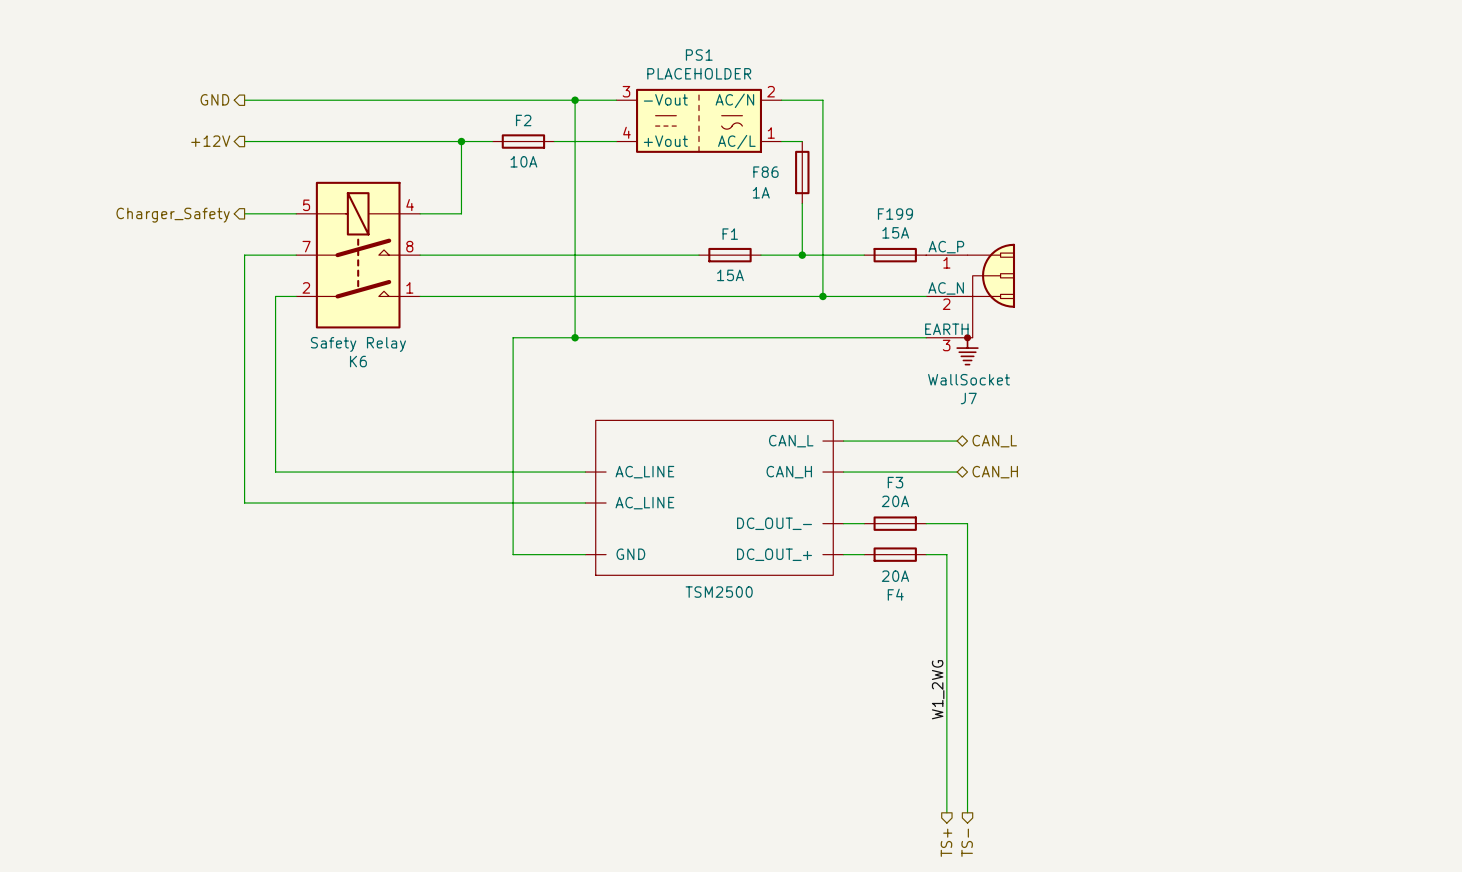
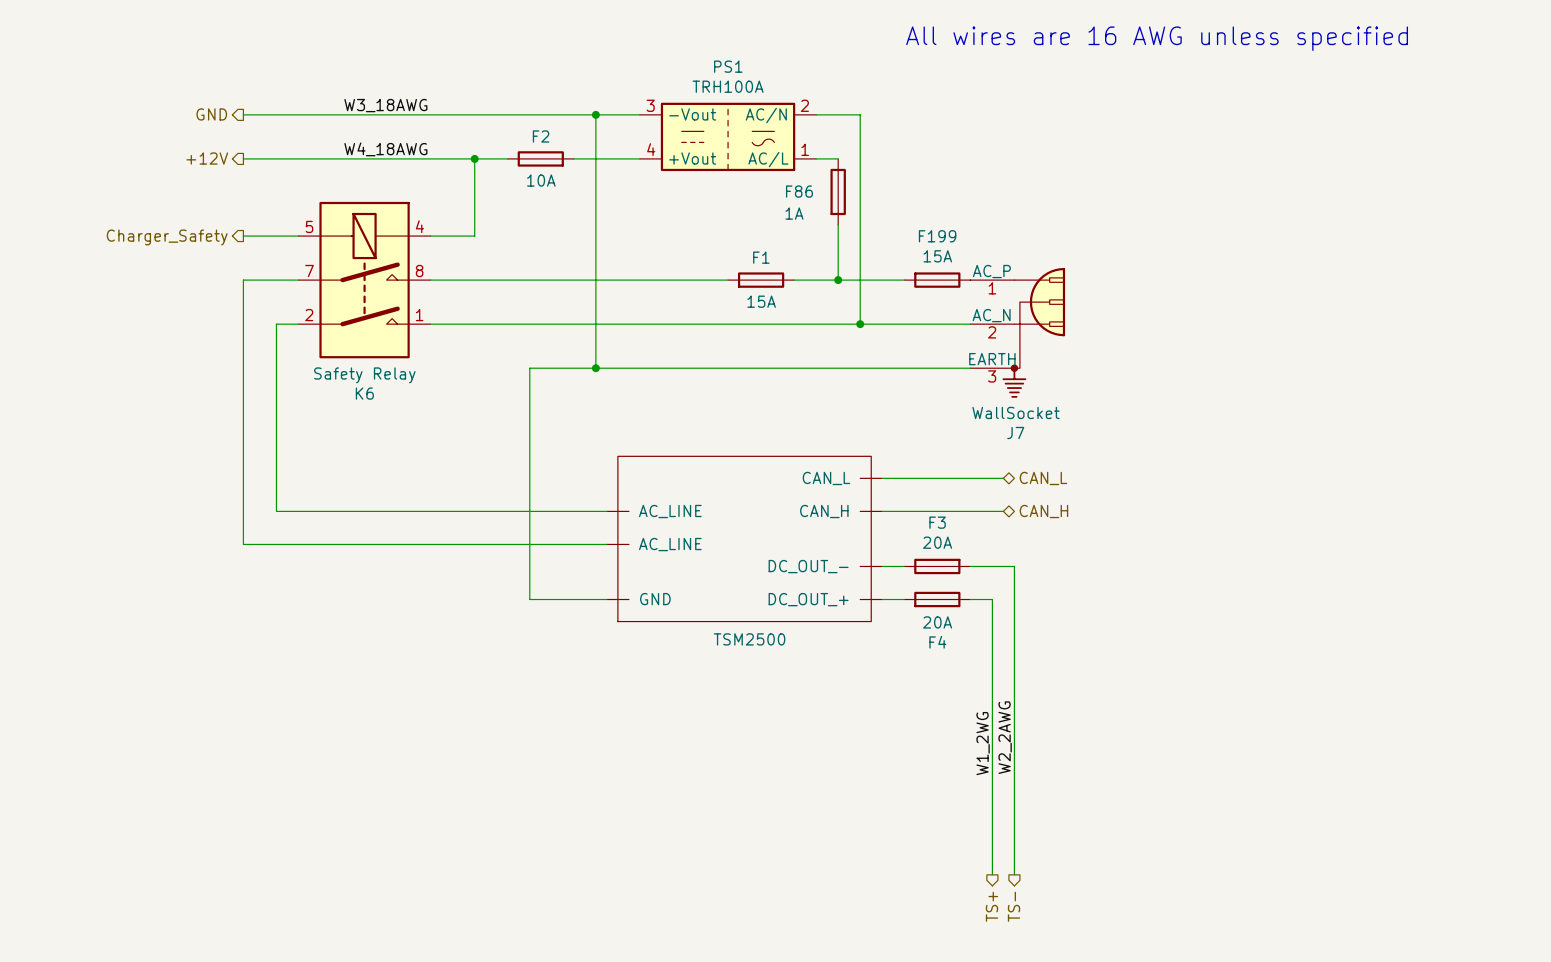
text: none -> All wires are 16 AWG unless specified (1157, 38)
PS1 value: PLACEHOLDER (699, 73) -> TRH100A (728, 86)
label: none -> W3_18AWG (385, 105)
label: none -> W4_18AWG (385, 149)
label: none -> W2_2AWG (1005, 737)

